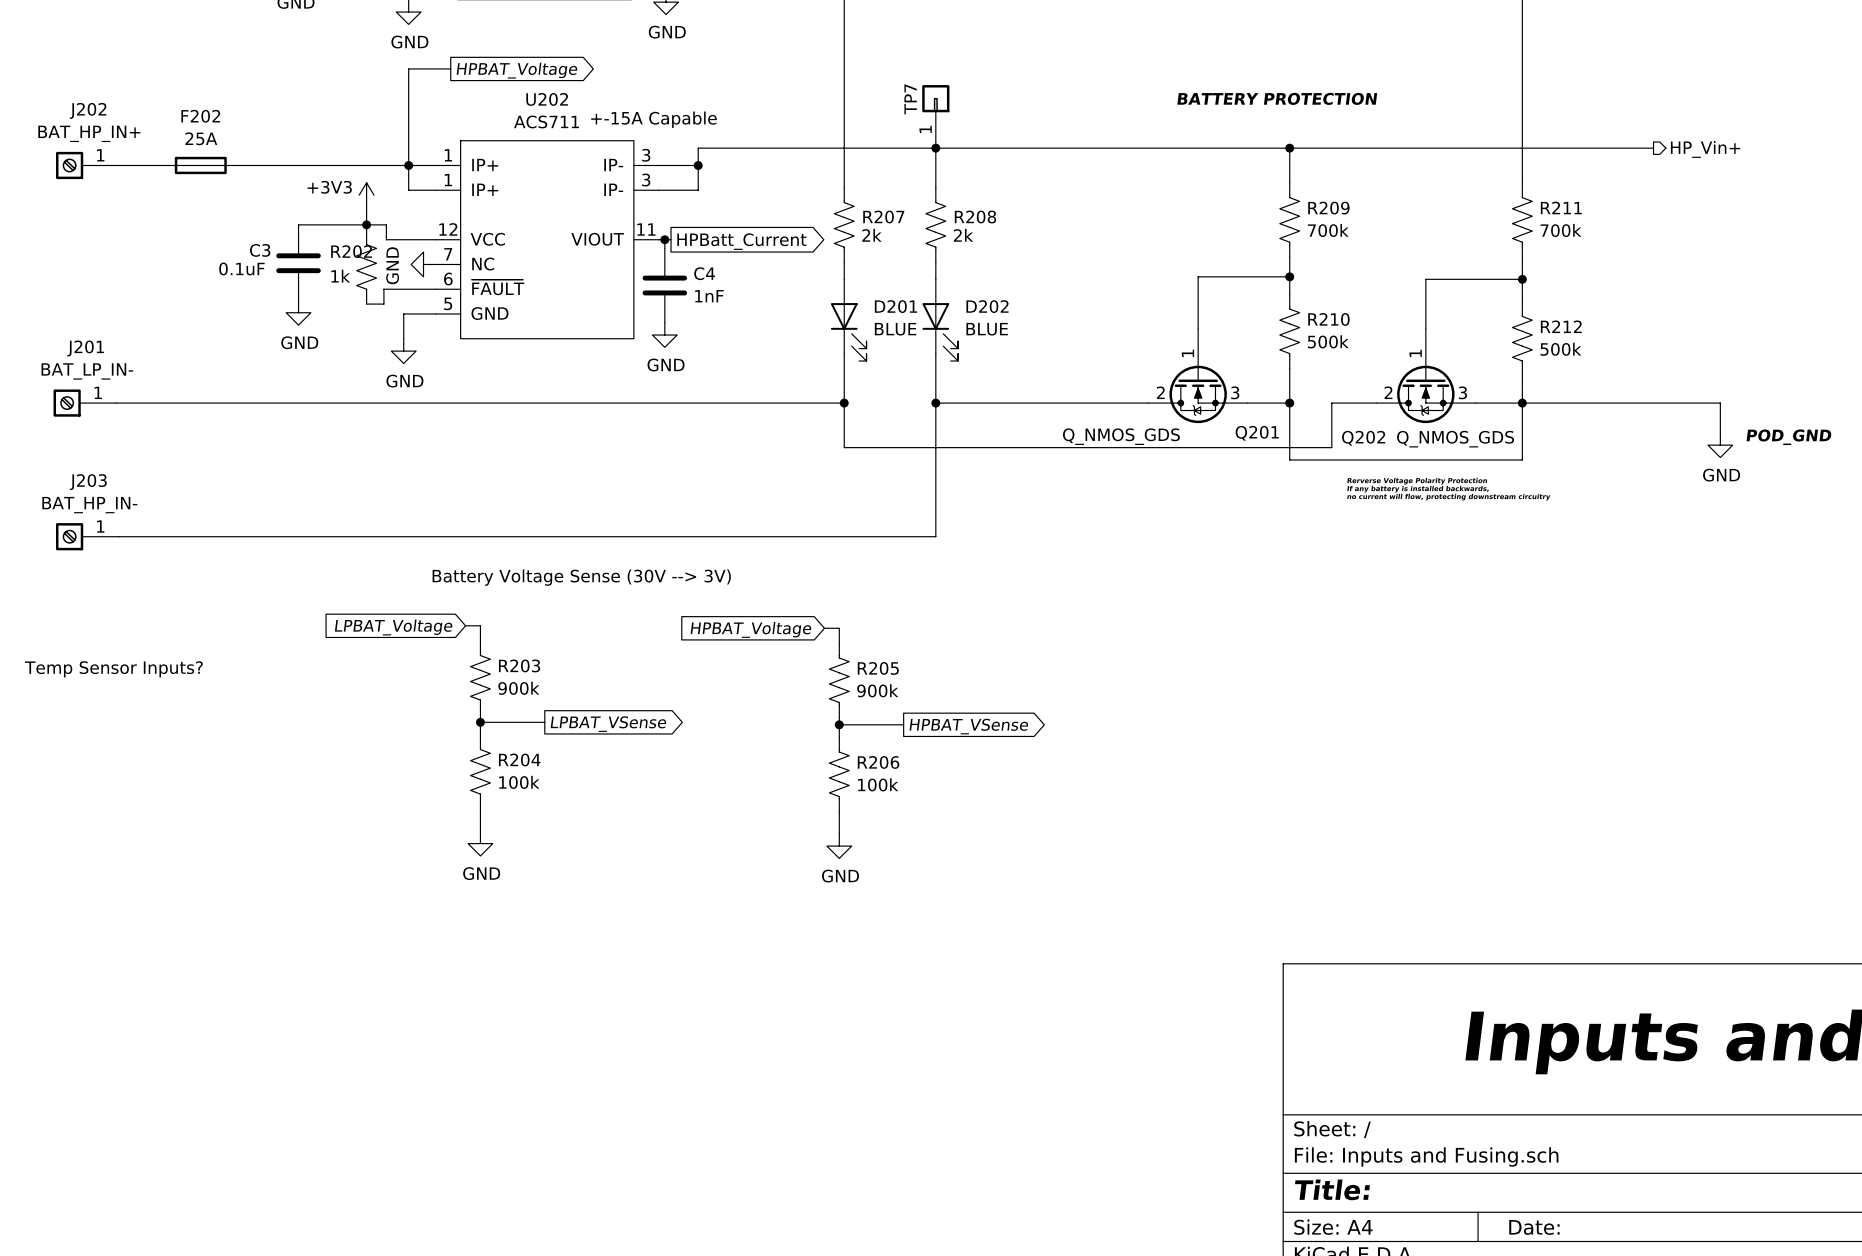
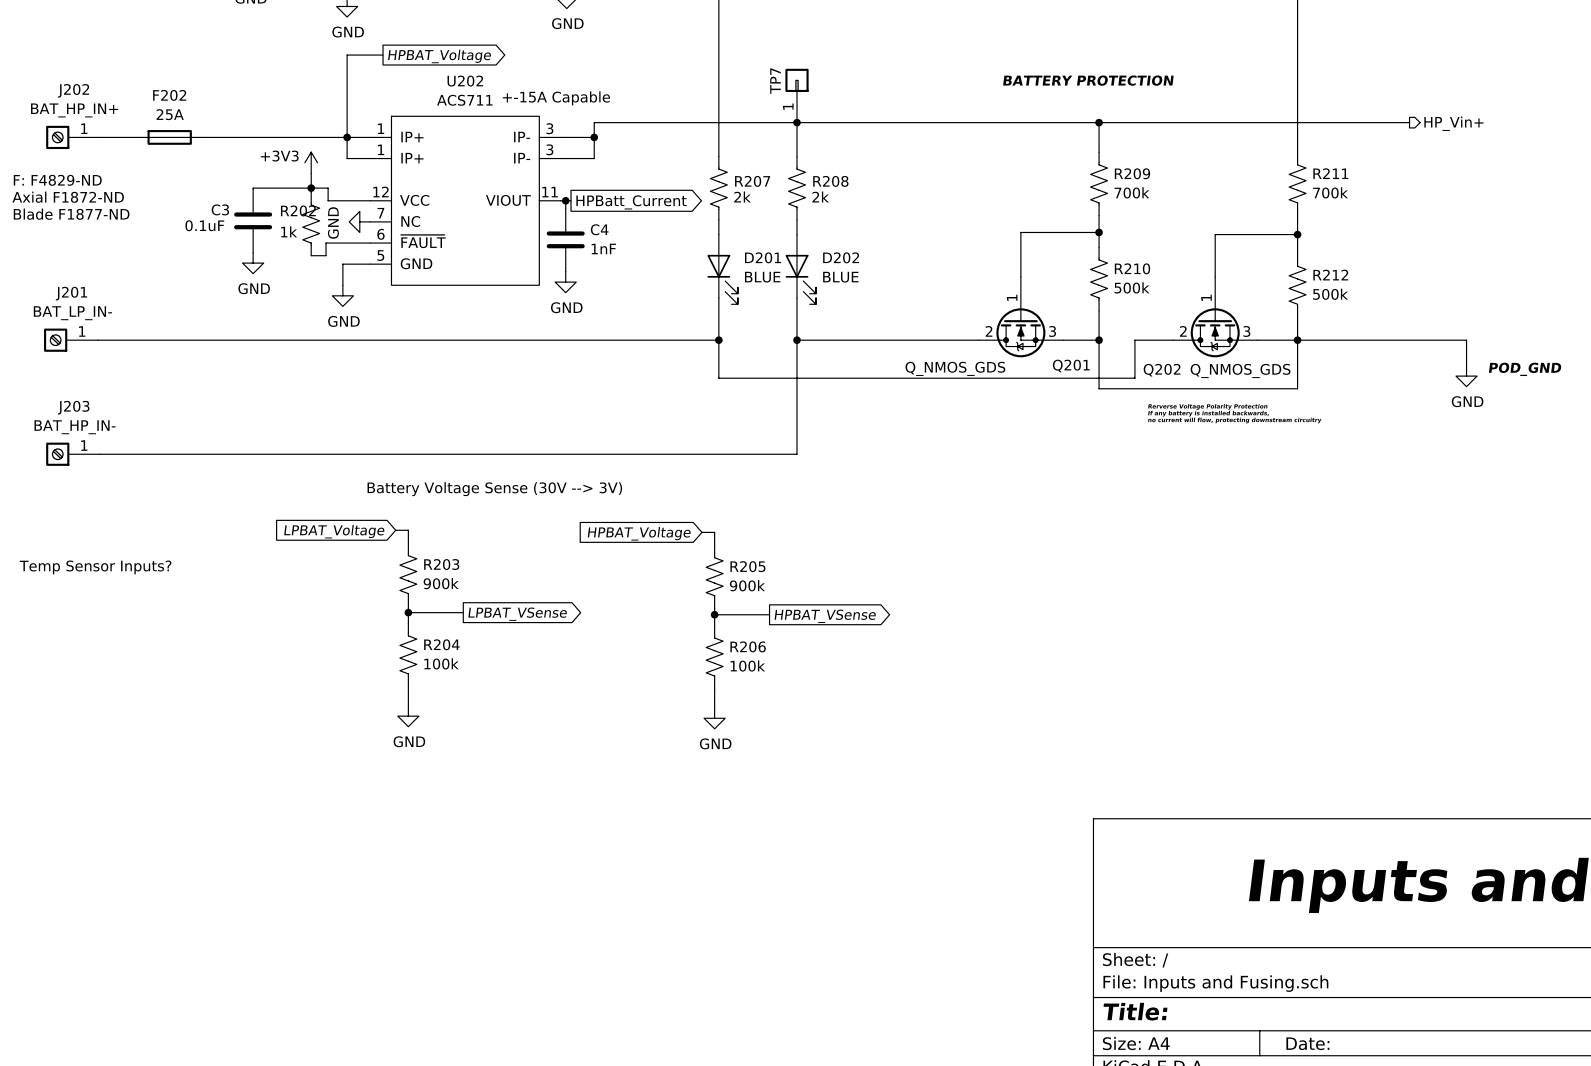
text: none -> F: F4829-ND (57, 180)
text: none -> Axial F1872-ND (68, 197)
text: none -> Blade F1877-ND (71, 214)

